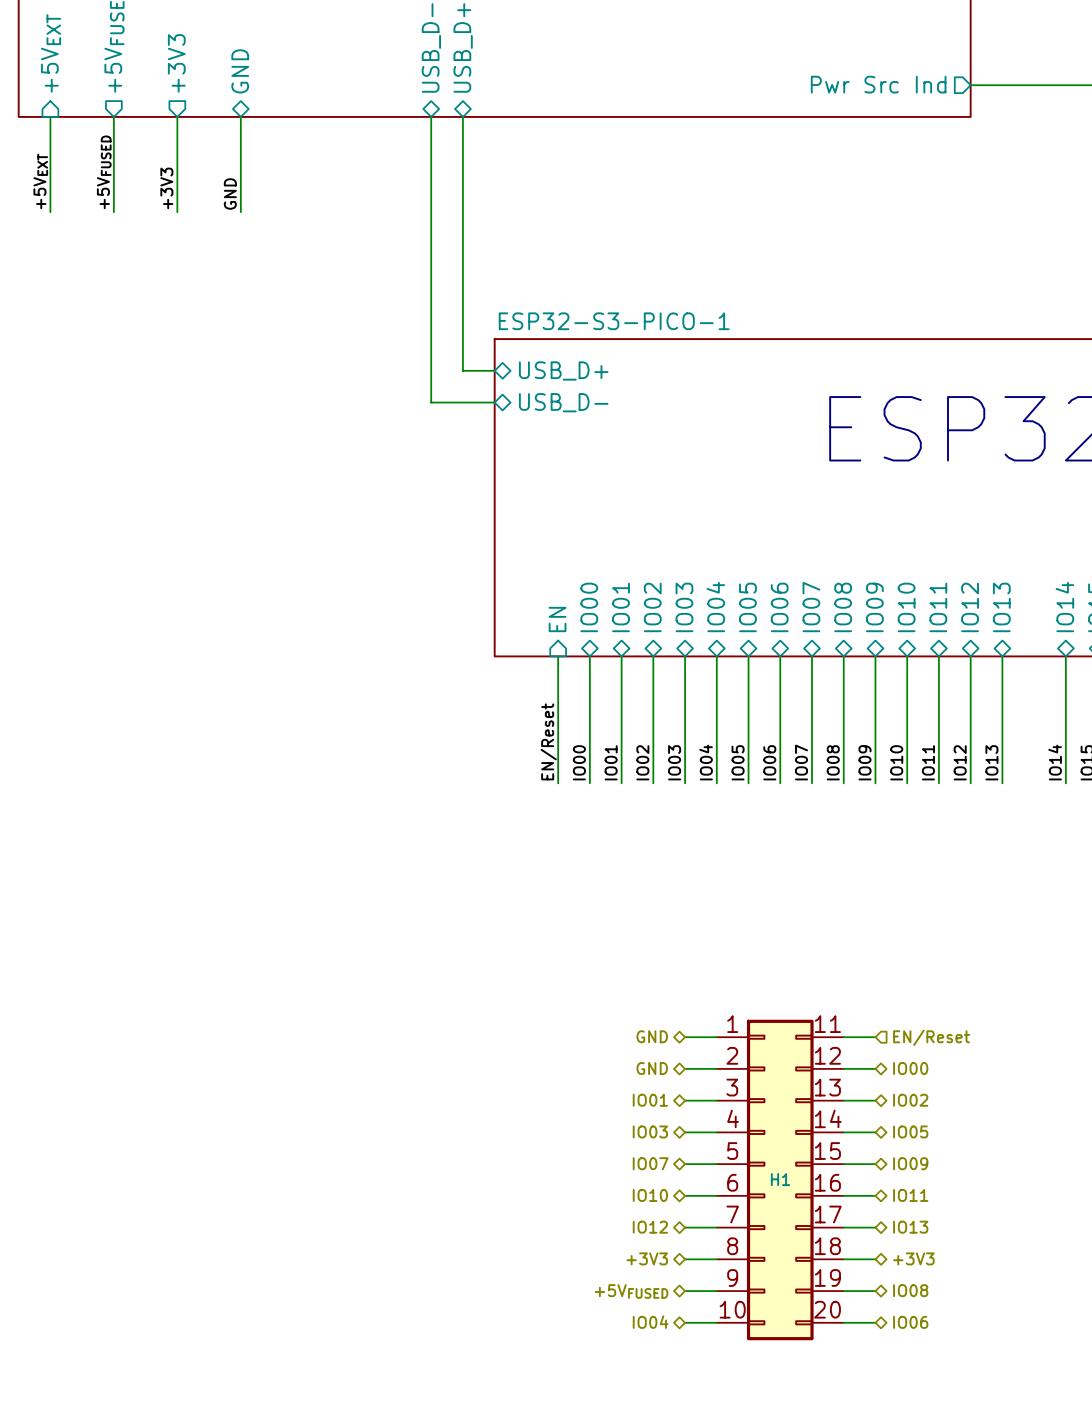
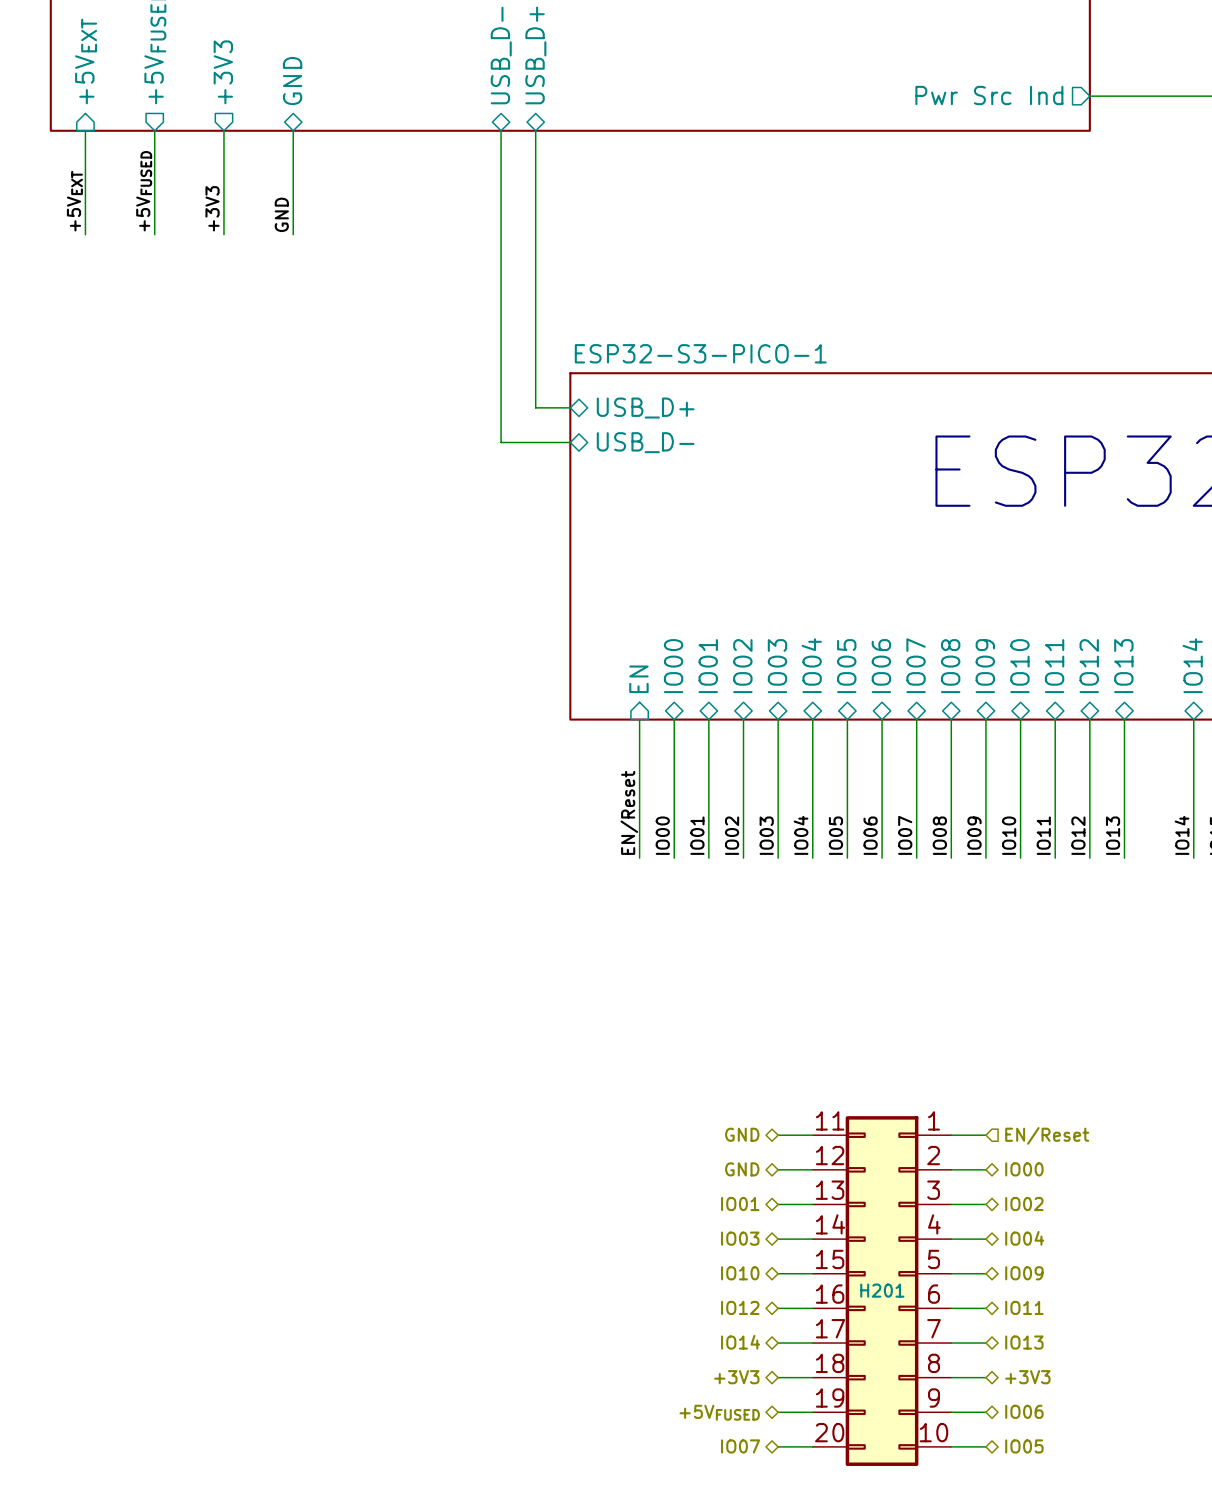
hierarchical label: IO05 (910, 1131) -> IO04 (1024, 1238)
hierarchical label: IO07 (650, 1163) -> IO10 (740, 1273)
H1 flip: as is (780, 1179) -> left-right (882, 1291)
H1 name: H1 (780, 1179) -> H201 (882, 1290)
hierarchical label: IO10 (650, 1195) -> IO12 (740, 1307)
hierarchical label: IO12 (650, 1227) -> IO14 (740, 1342)
hierarchical label: IO08 (910, 1290) -> IO06 (1024, 1411)
hierarchical label: IO04 (650, 1322) -> IO07 (740, 1446)
hierarchical label: IO06 (910, 1322) -> IO05 (1024, 1446)

